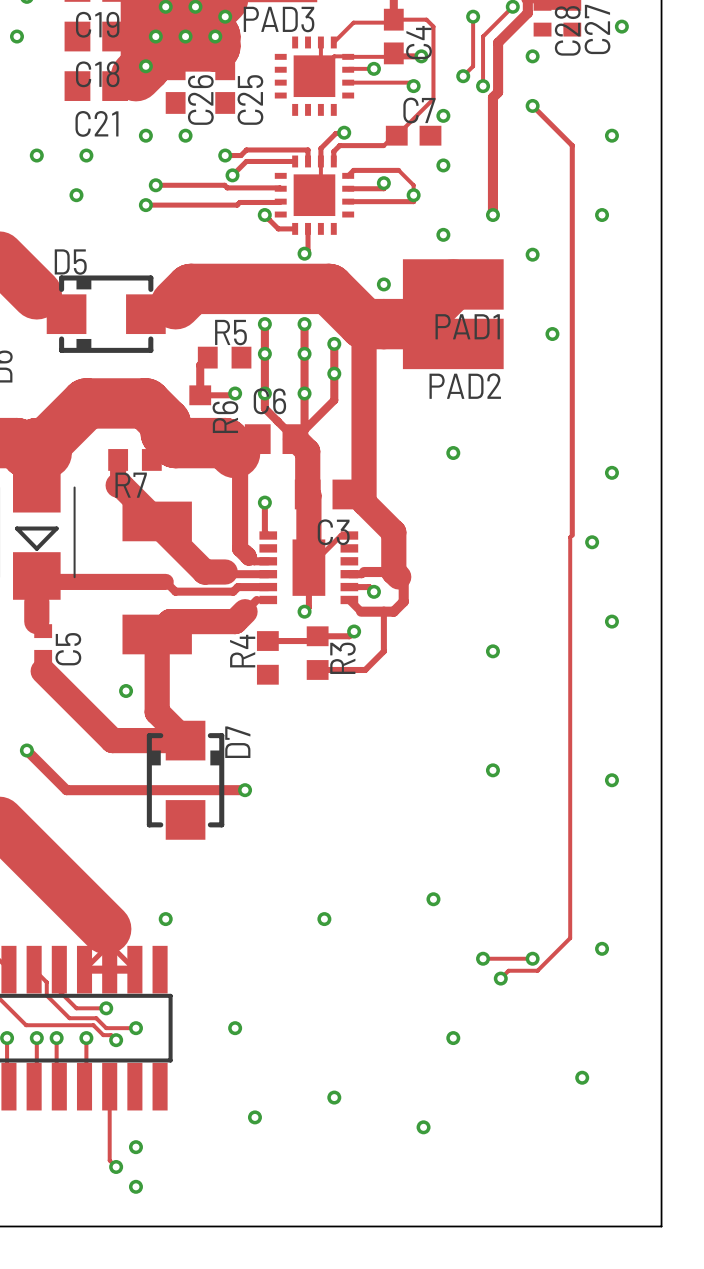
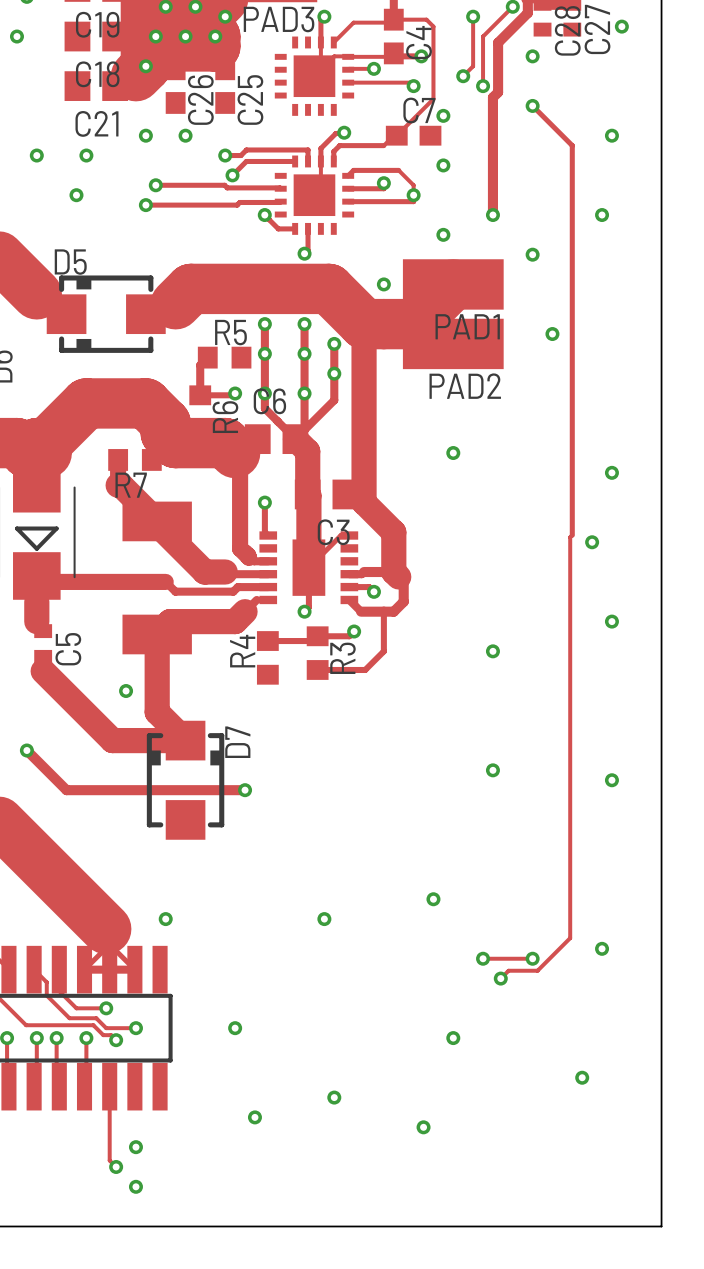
track: none -> (324, 16) (320, 20) (320, 42)
via: none -> (324, 16)

